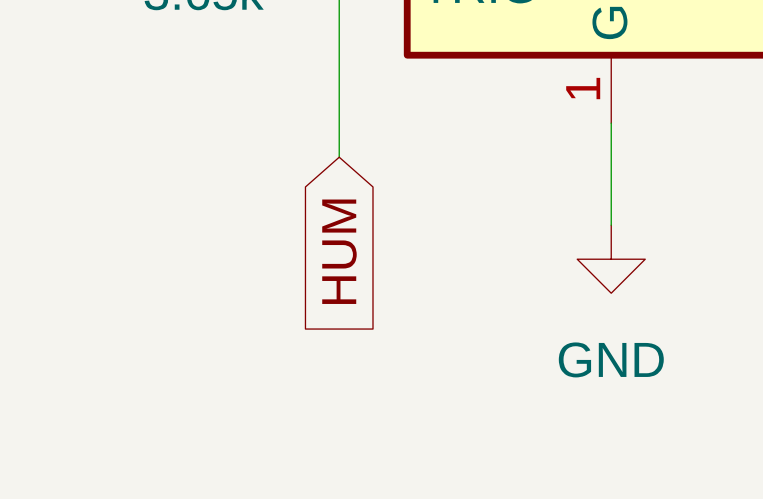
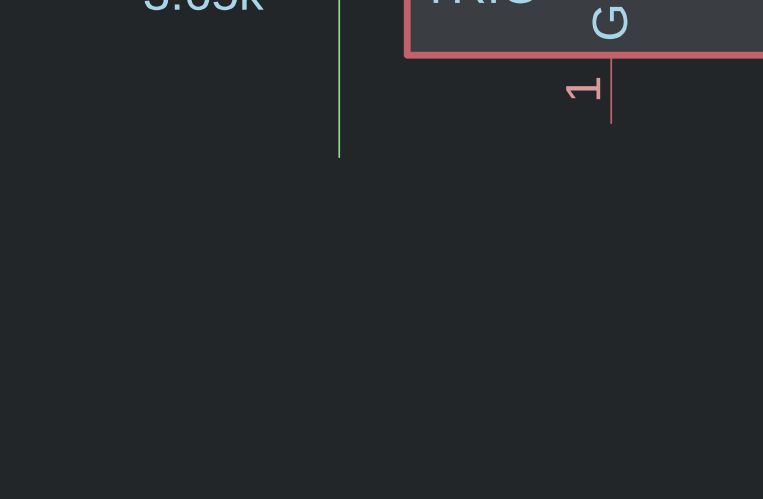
wire: (611, 123) (611, 225) -> none
global label: HUM (339, 251) -> none
power symbol: GND (611, 259) -> none

